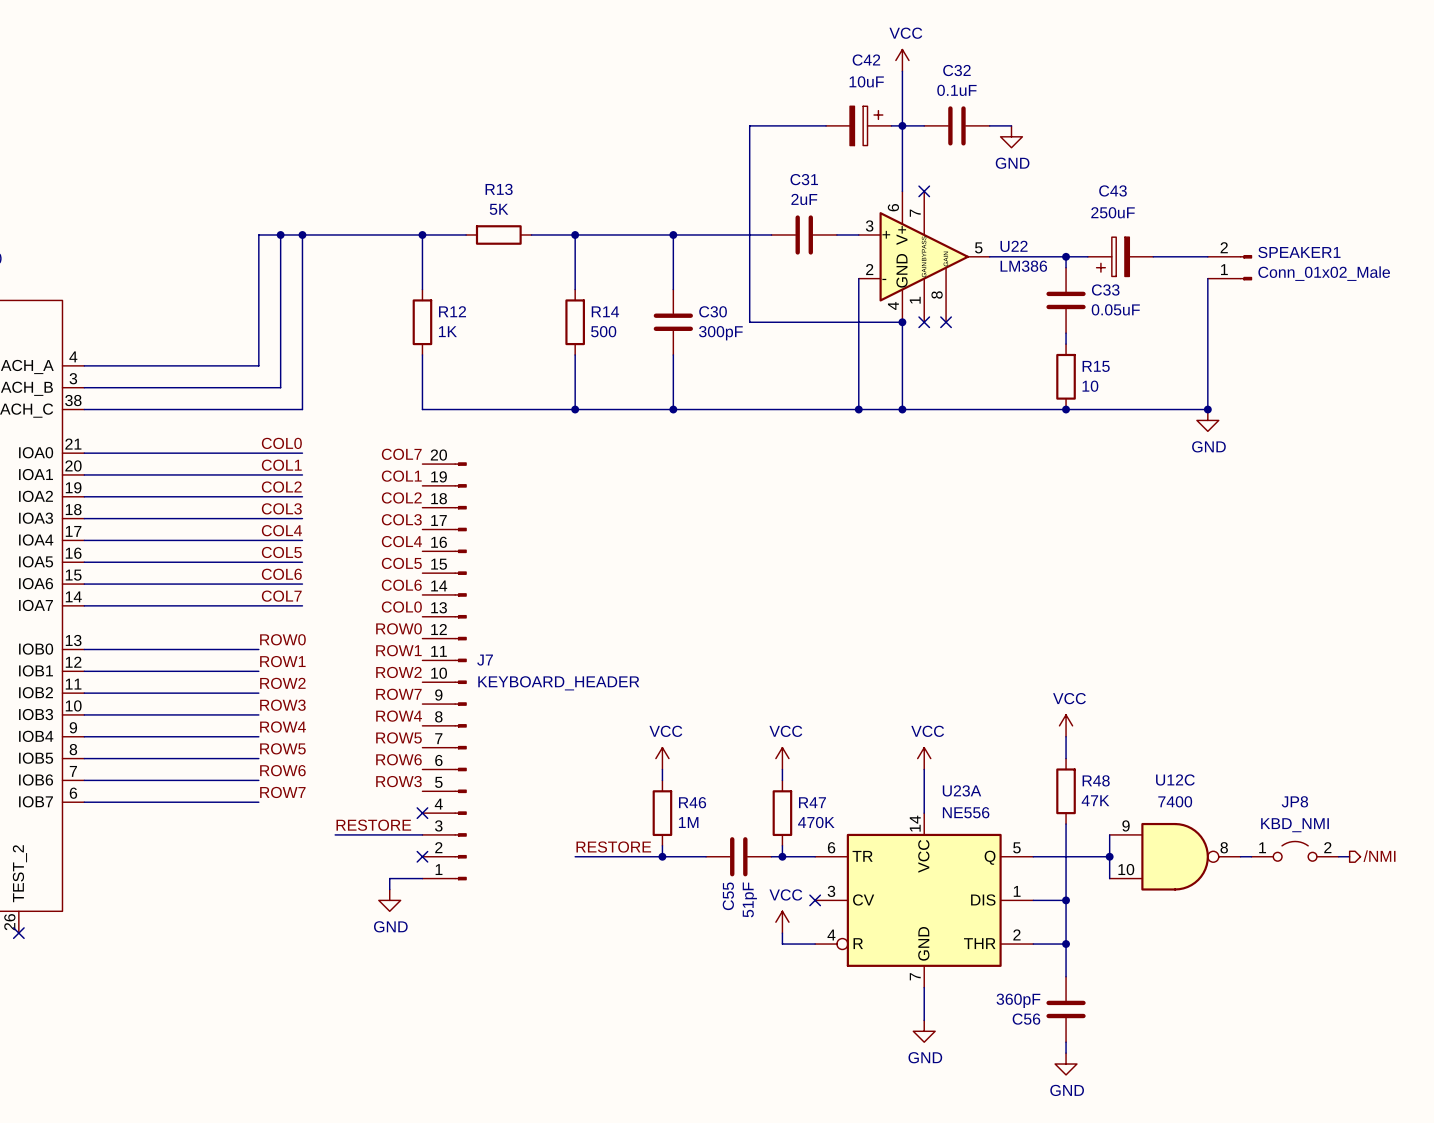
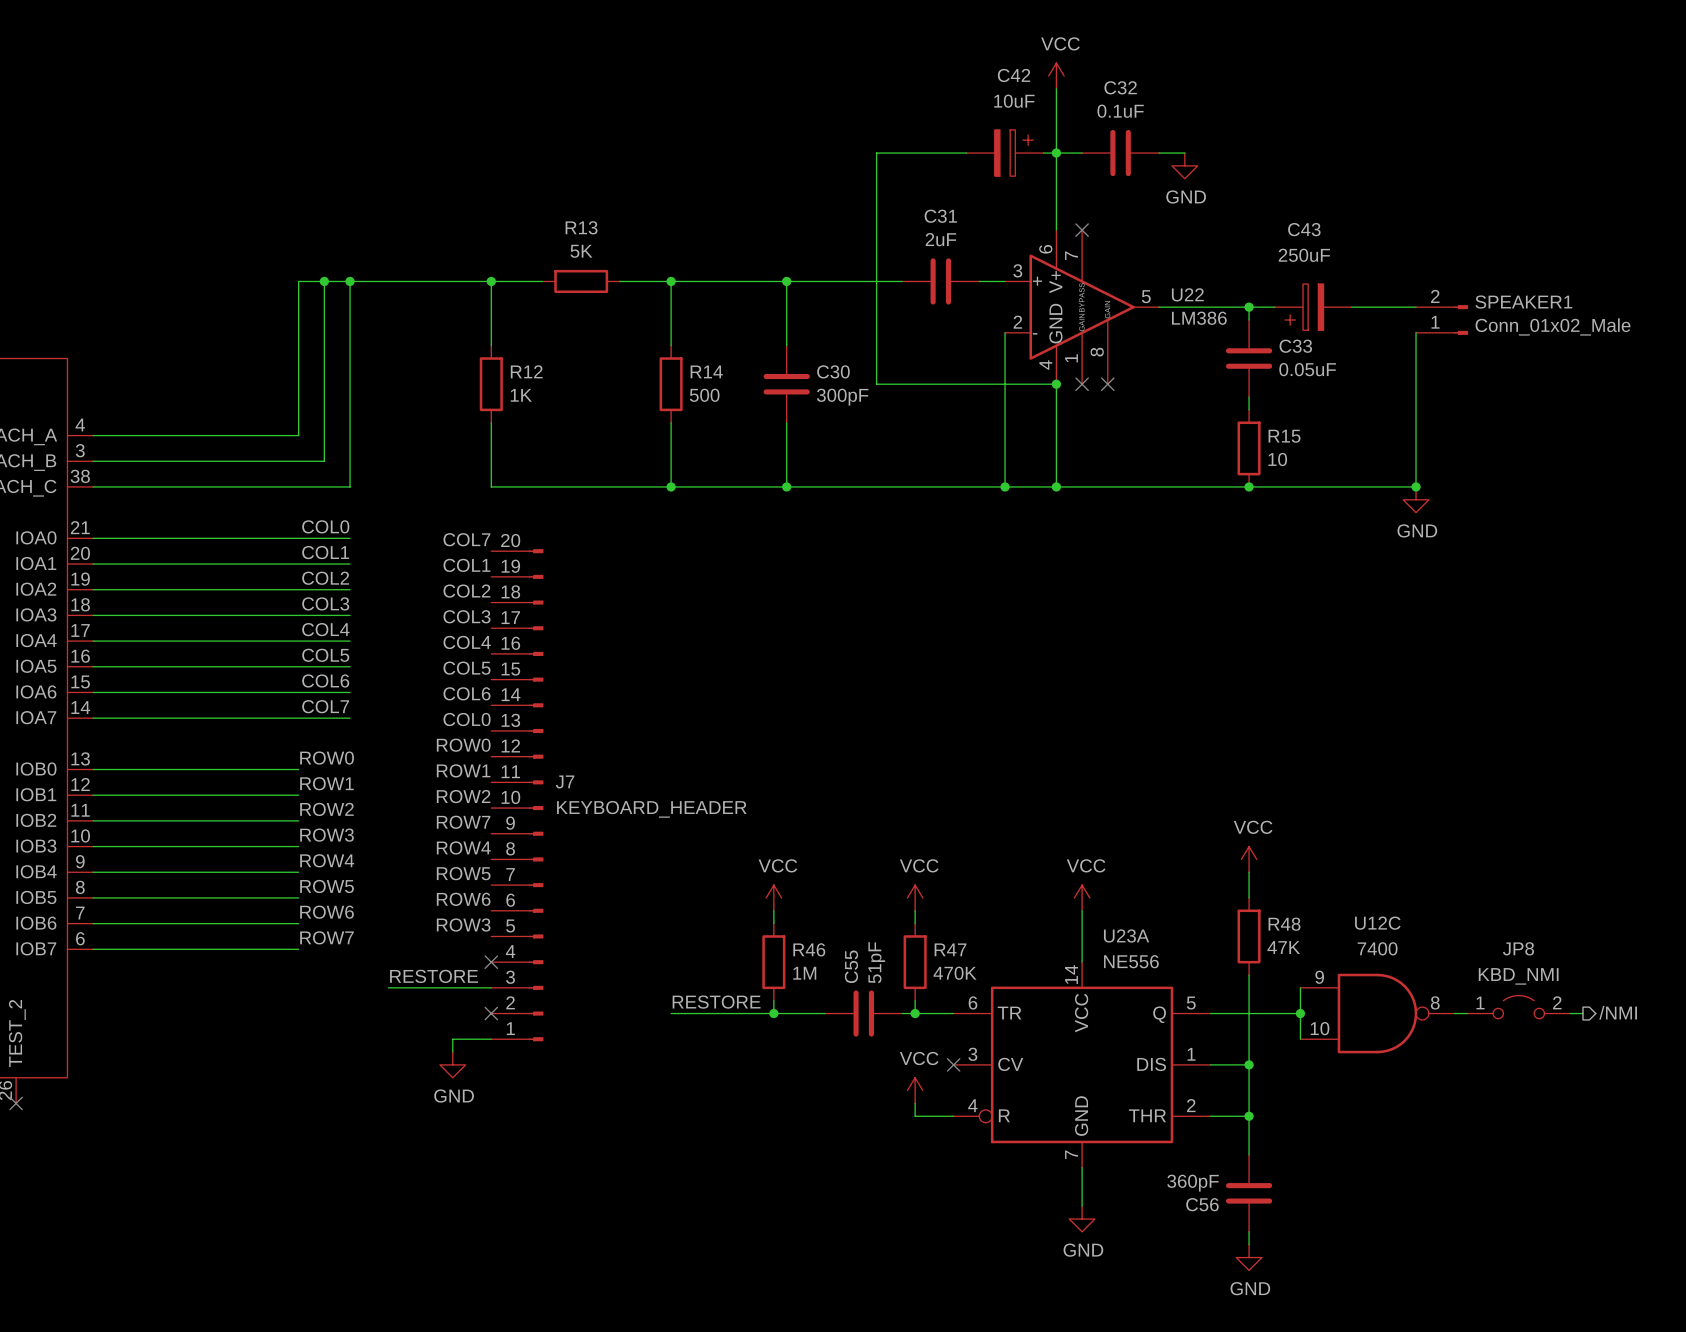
C55 name position: C55 (728, 896) -> C55 (851, 966)
C55 value position: 51pF (749, 899) -> 51pF (876, 962)

